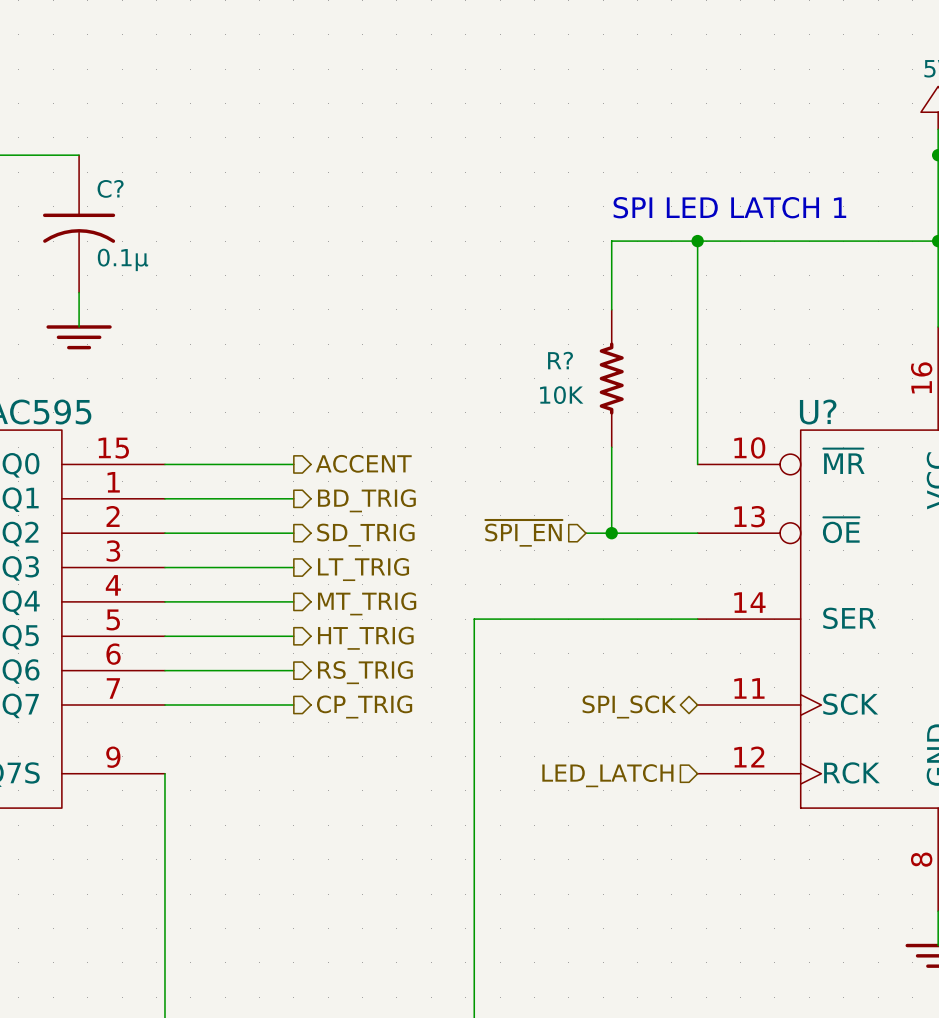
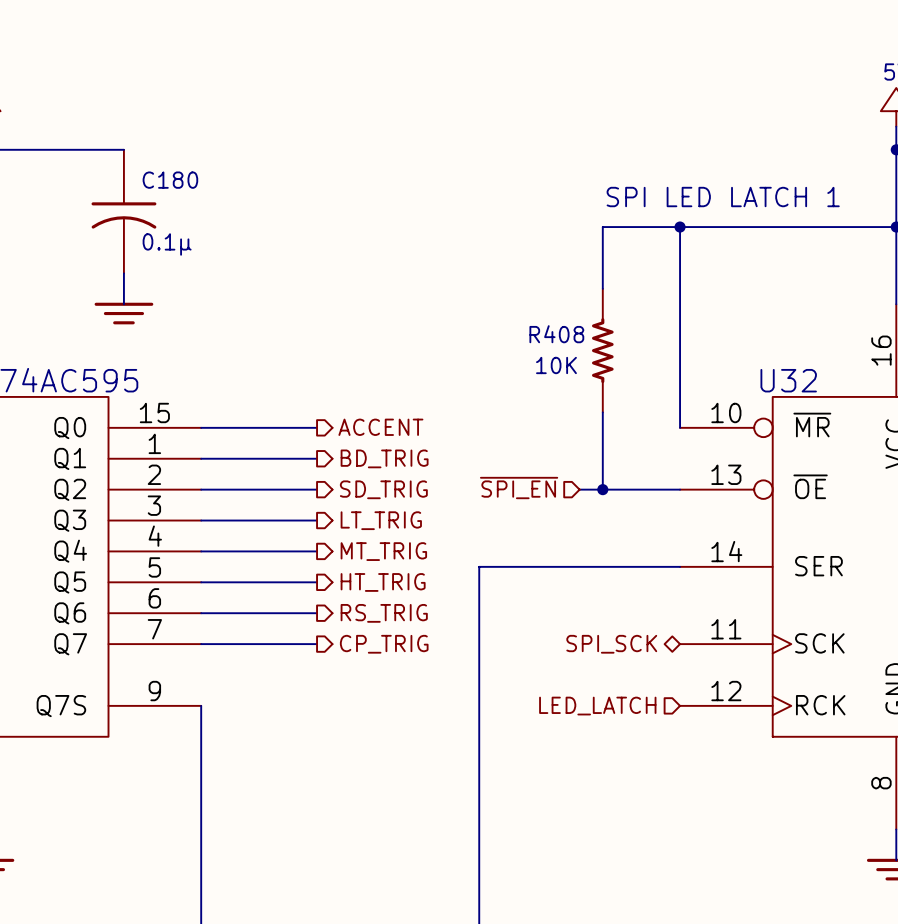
C? name: C? (110, 188) -> C180 (170, 180)
R? name: R? (560, 360) -> R408 (556, 334)
U? name: U? (818, 412) -> U32 (788, 380)

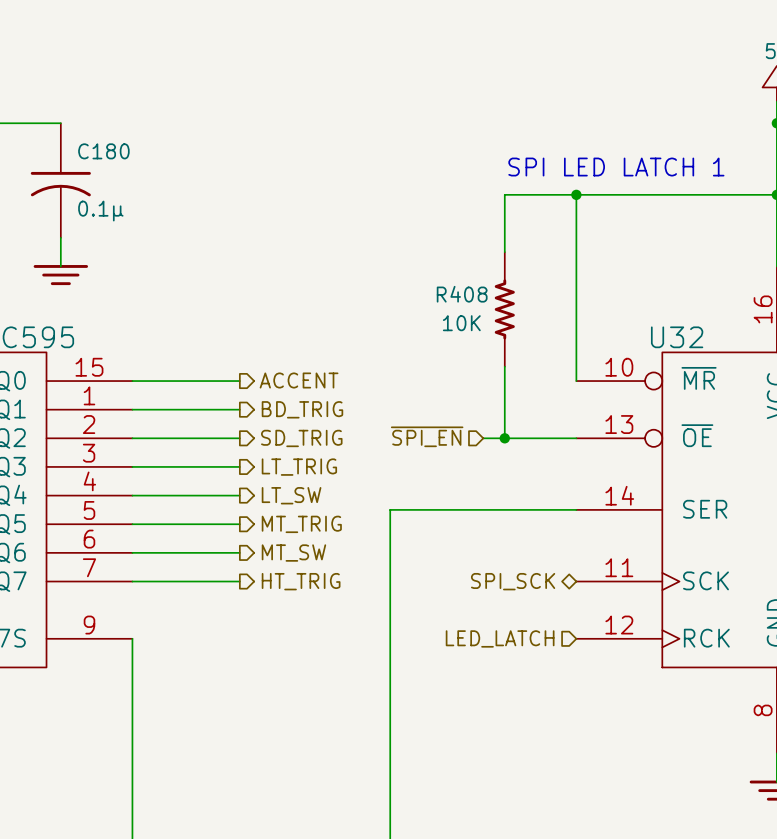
hierarchical label: MT_TRIG (383, 551) -> LT_SW (291, 495)
hierarchical label: HT_TRIG (383, 582) -> MT_TRIG (301, 524)
hierarchical label: RS_TRIG (384, 613) -> MT_SW (293, 553)
hierarchical label: CP_TRIG (384, 644) -> HT_TRIG (301, 581)

